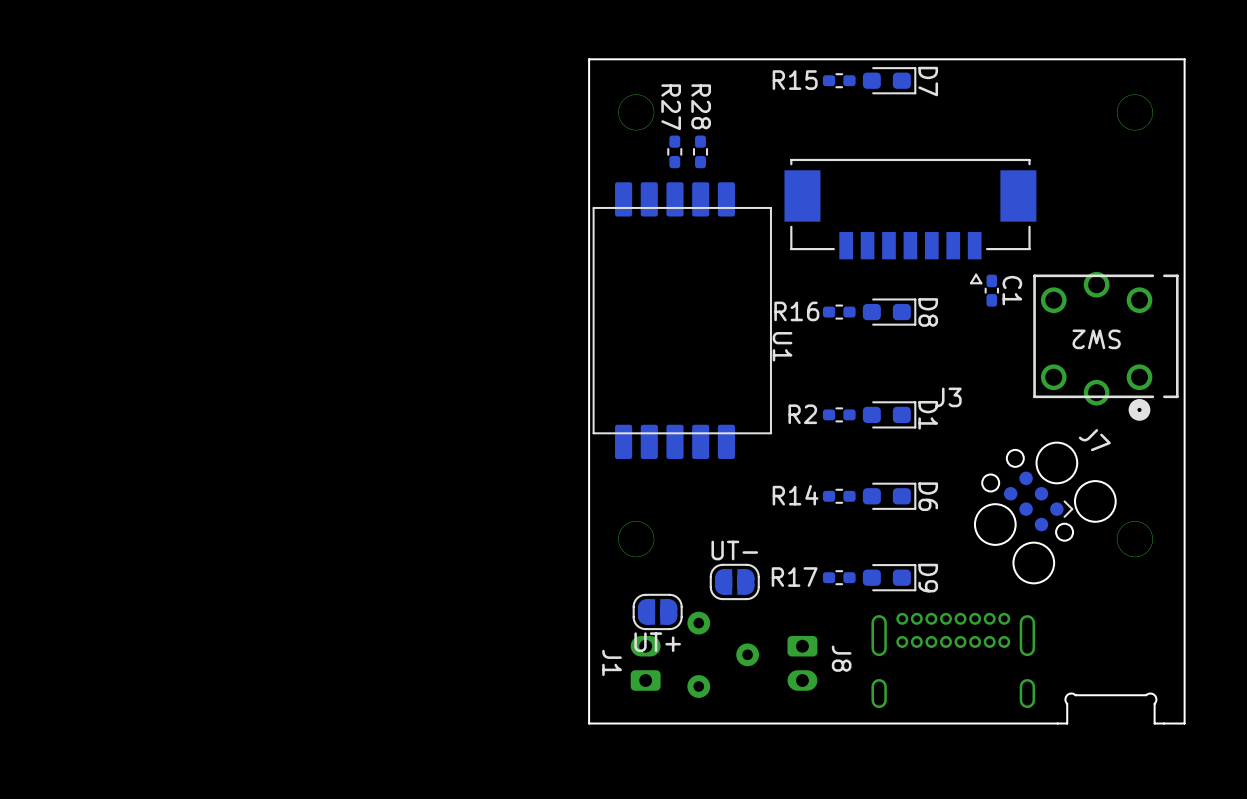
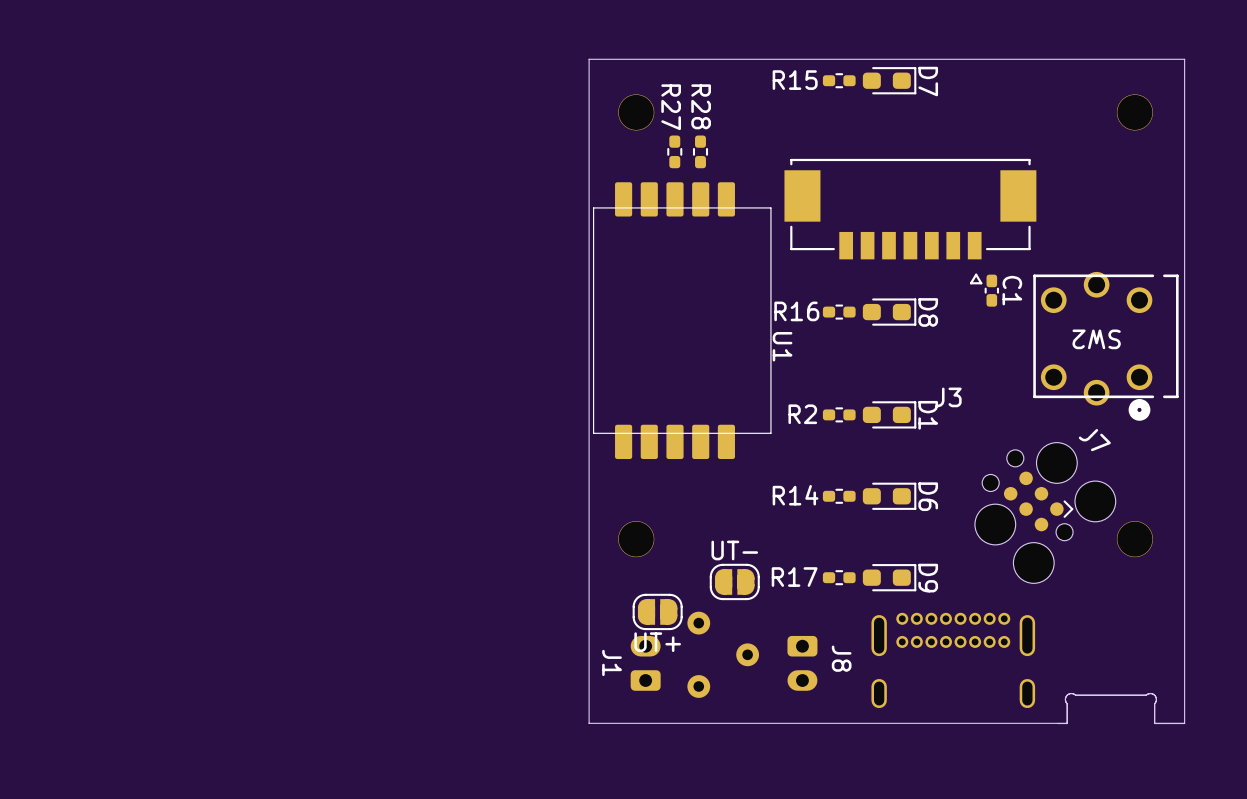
board edge: (1057, 723) (589, 723) -> (1184, 723) (1154, 723) (1156, 699) (1152, 693) (1075, 695) (1071, 693) (1065, 698) (1067, 723) (589, 723)

